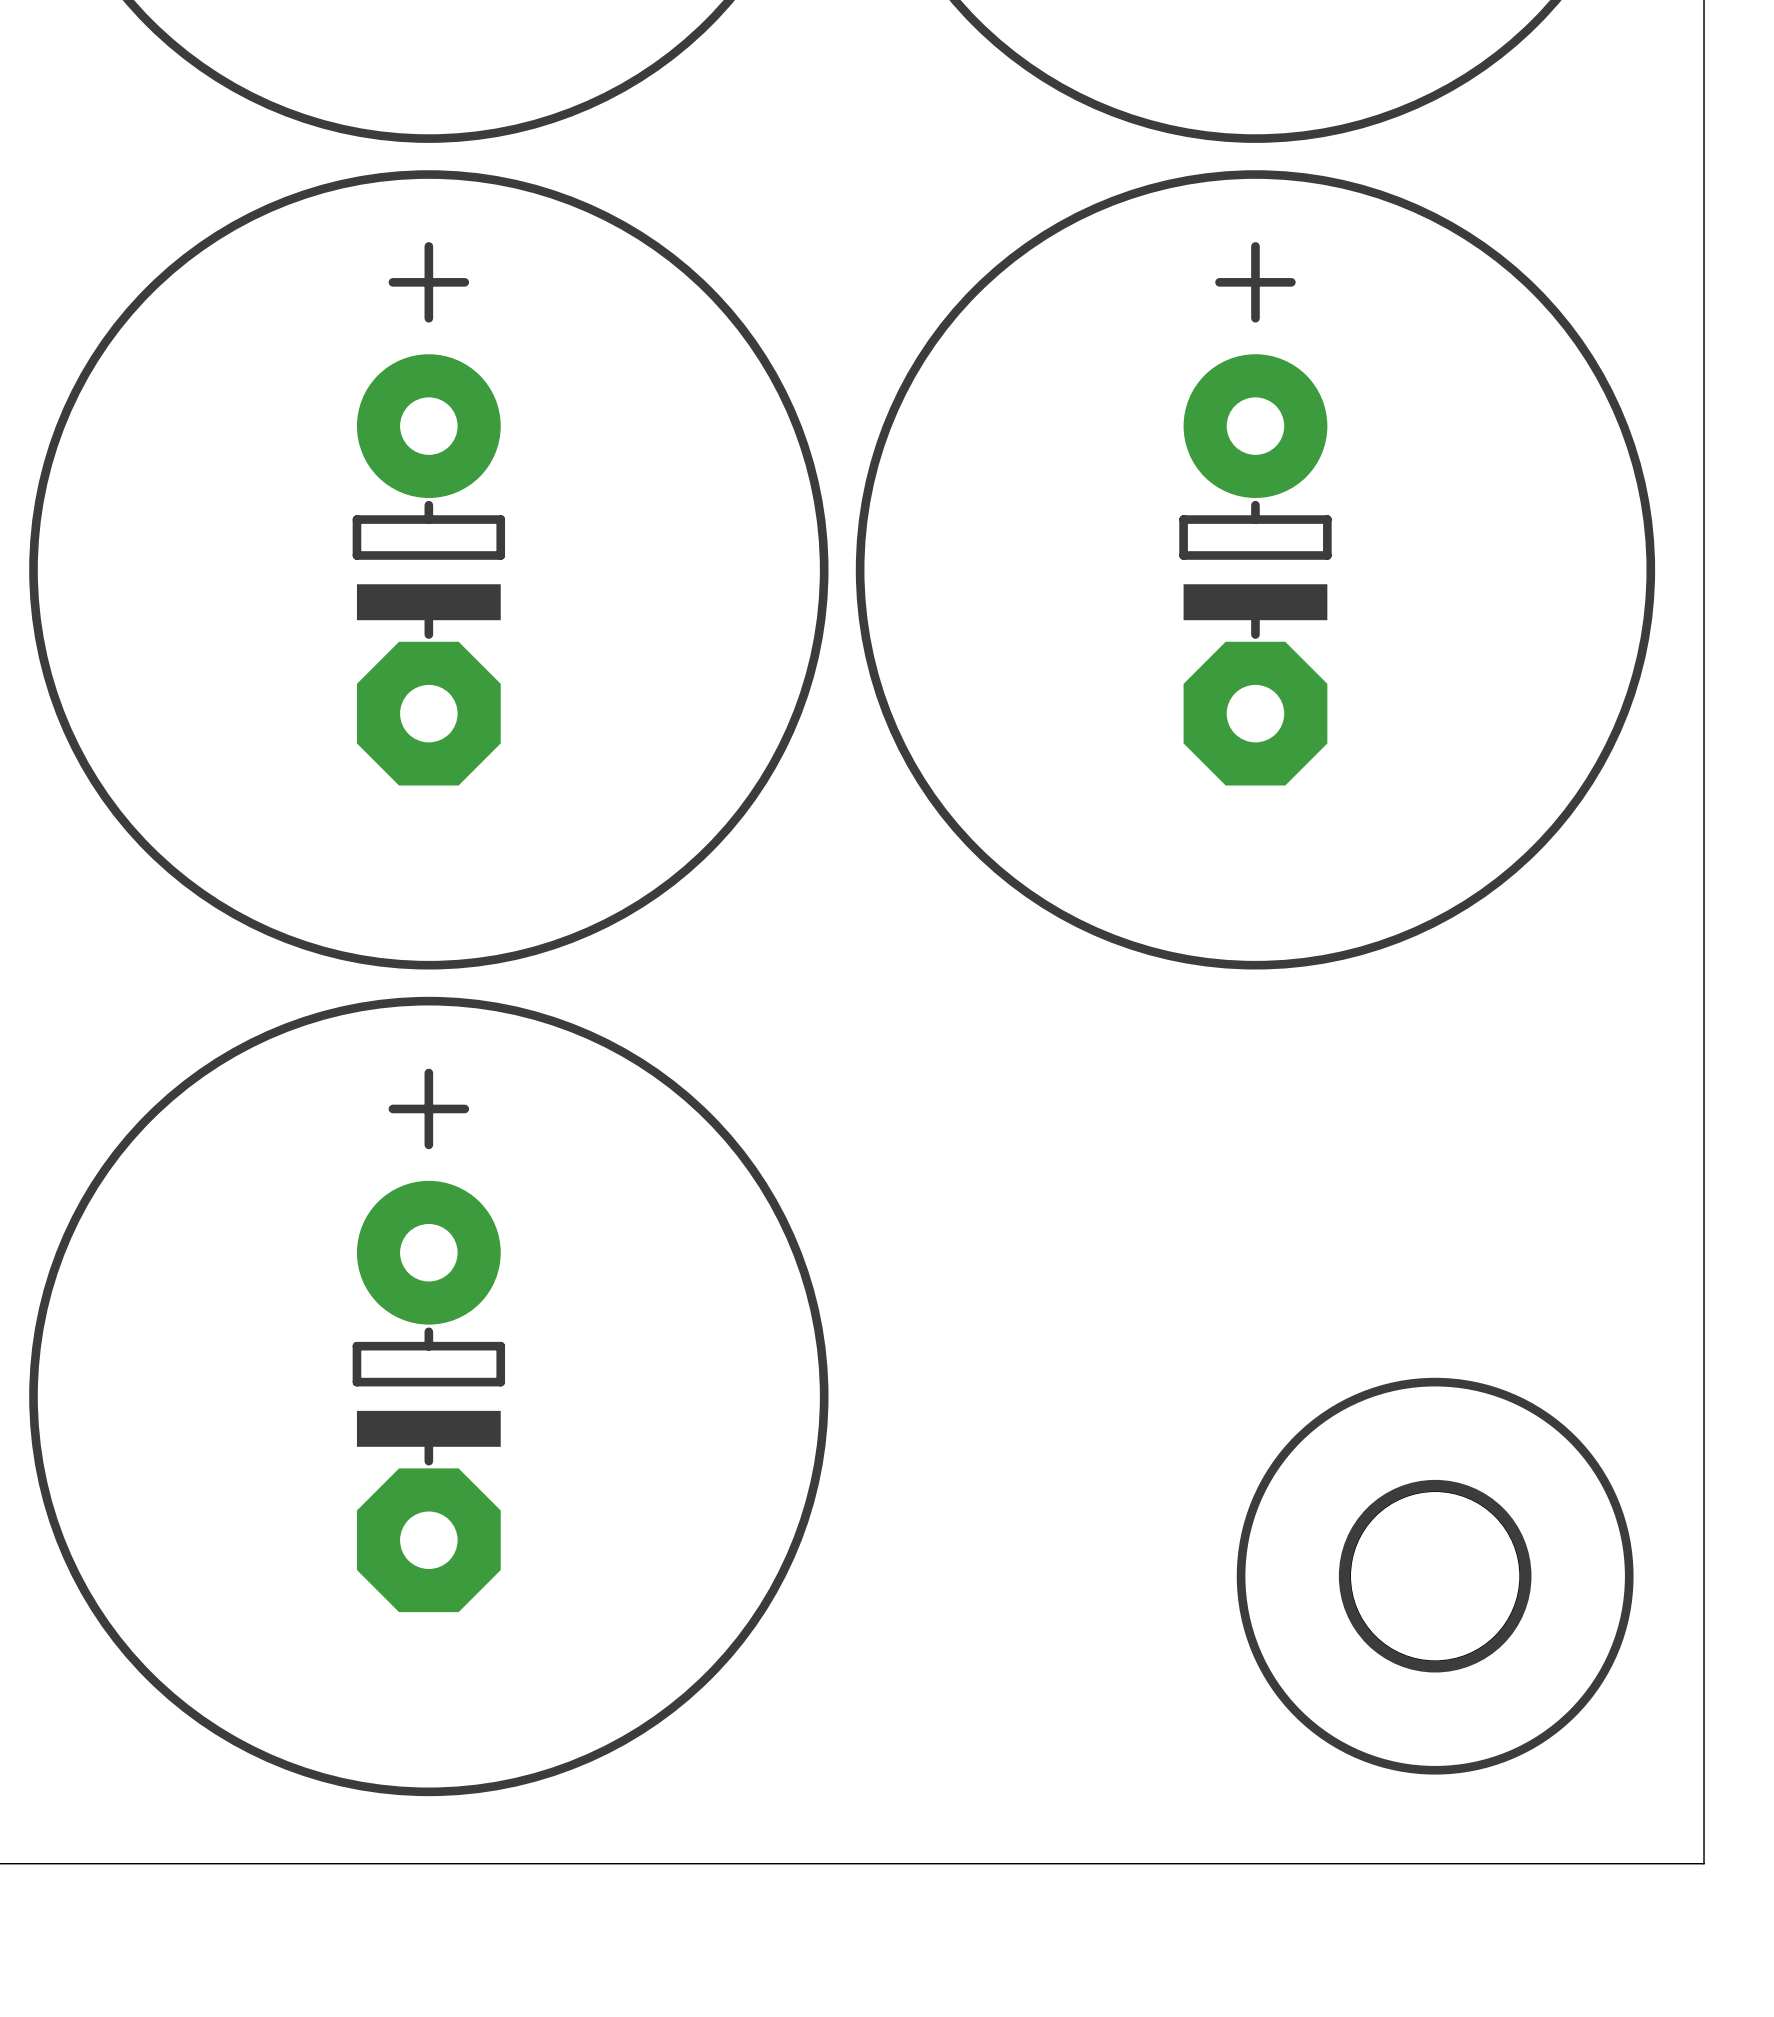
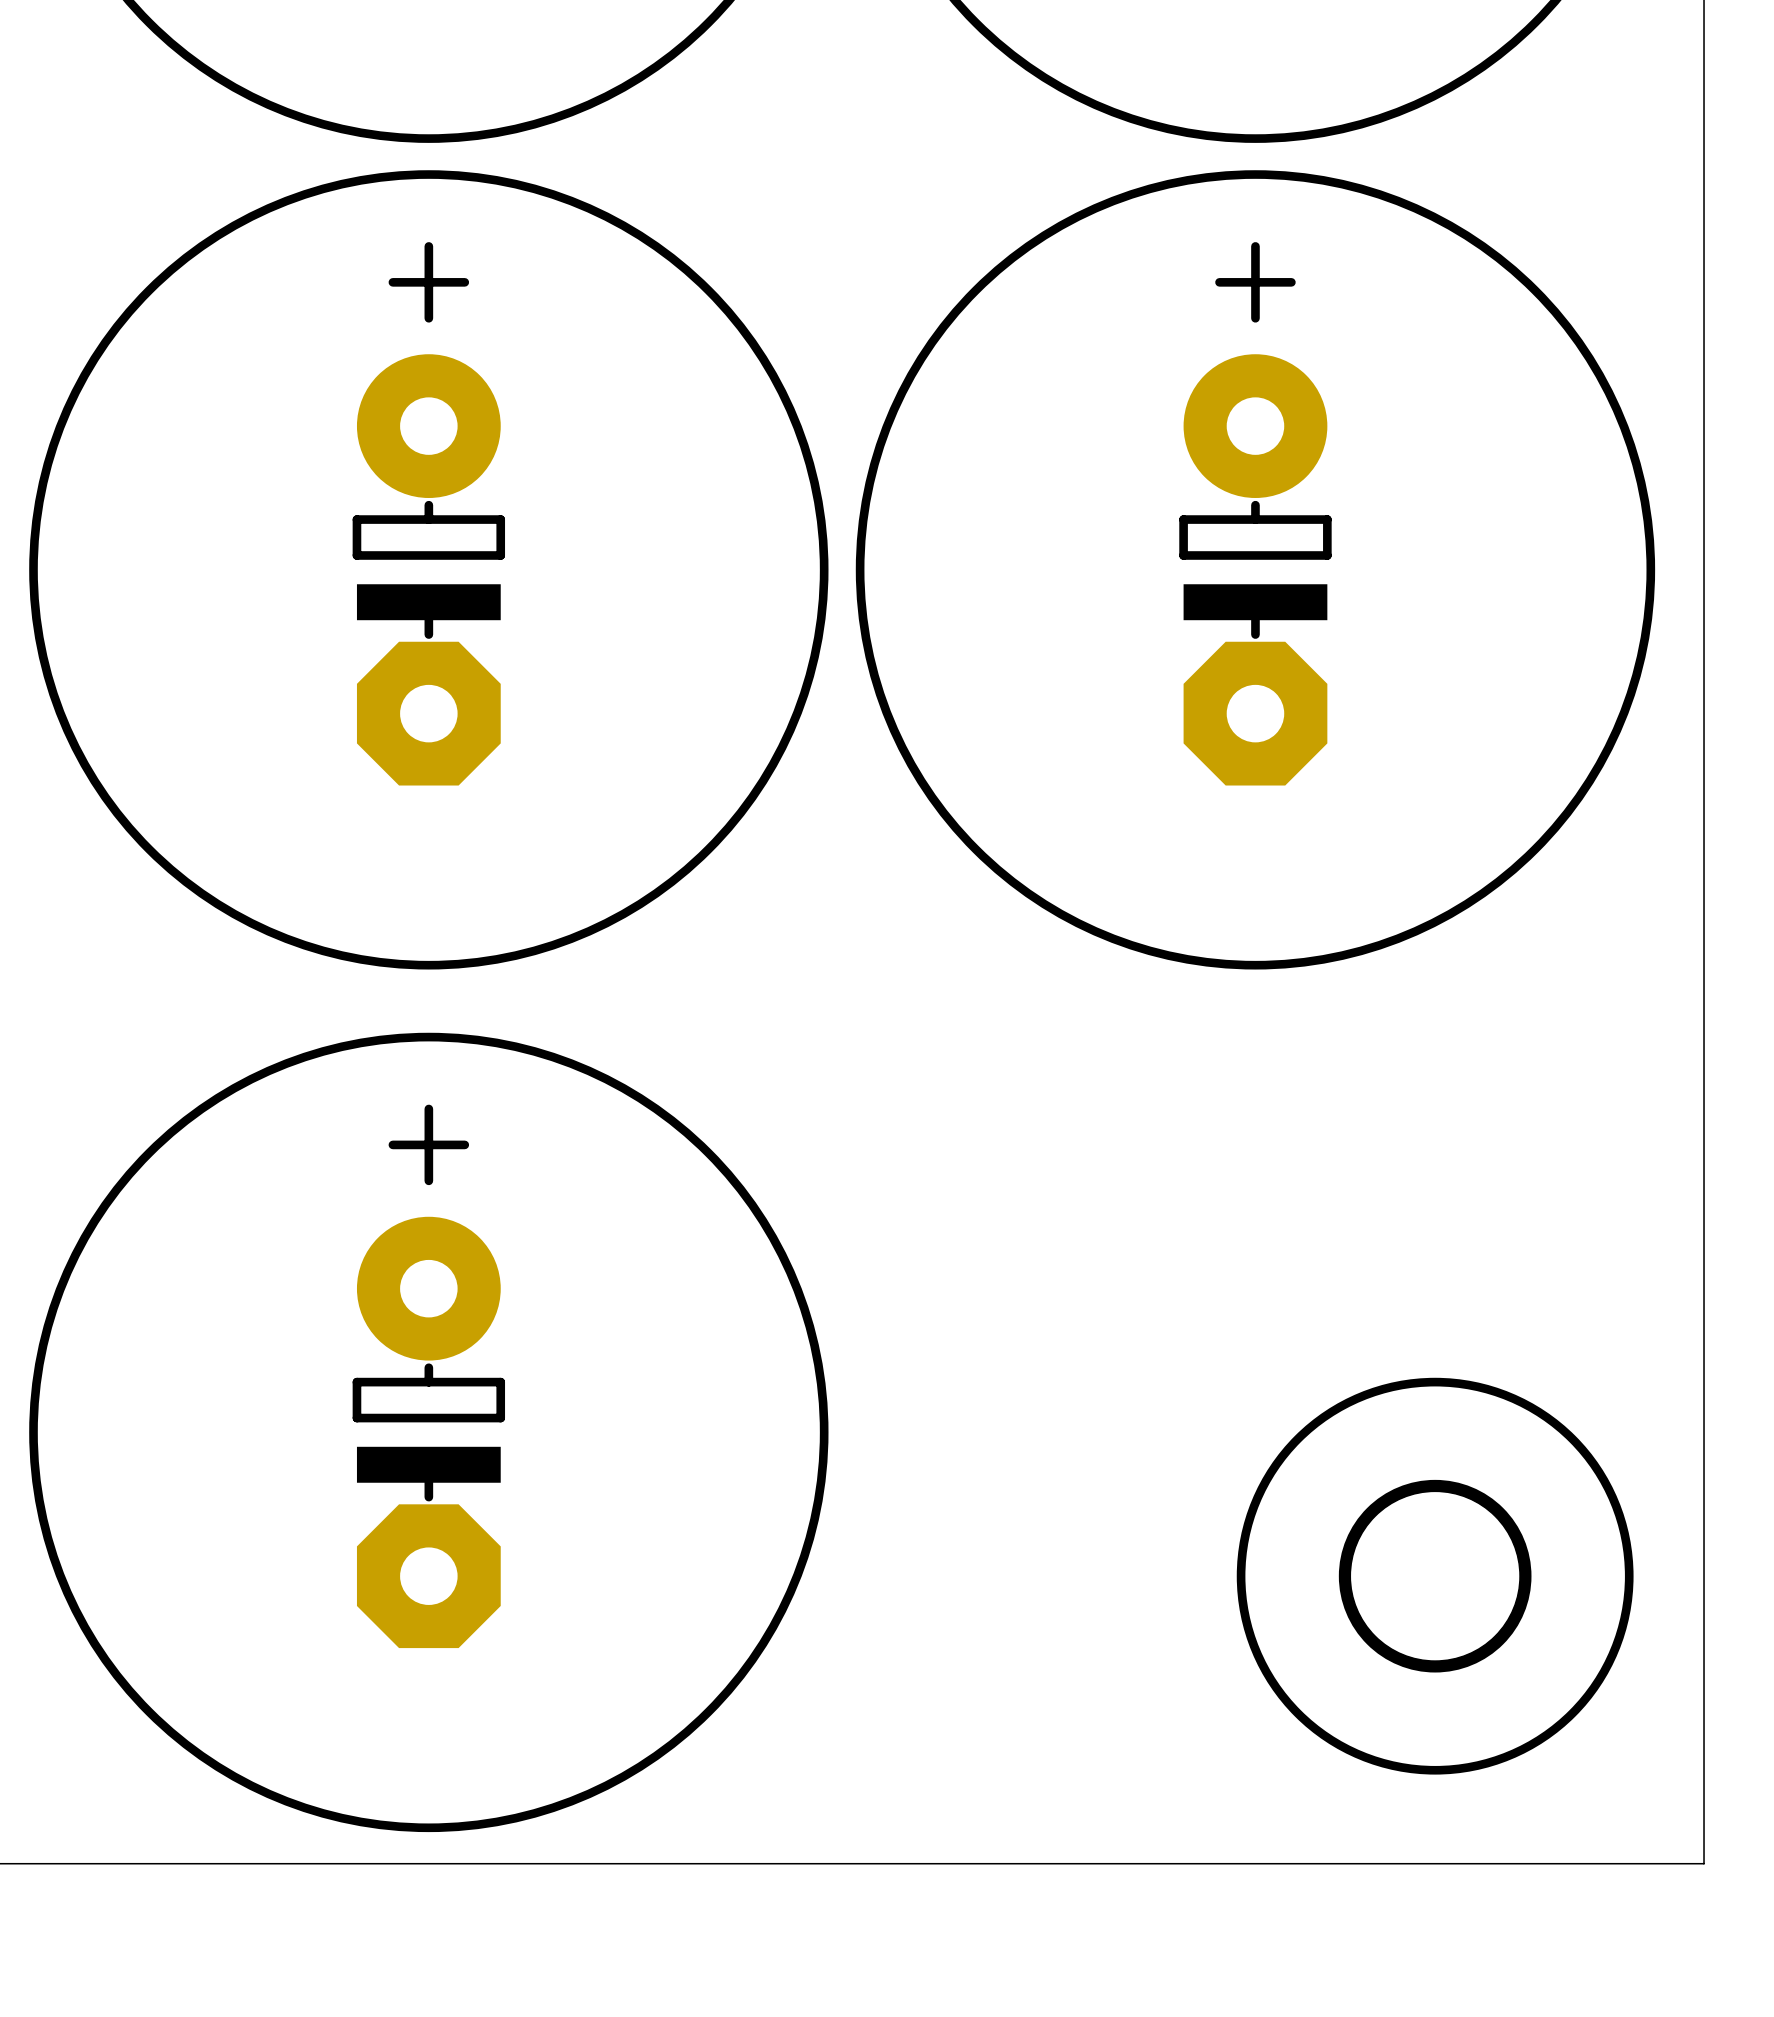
part position: (428, 1396) -> (428, 1432)

